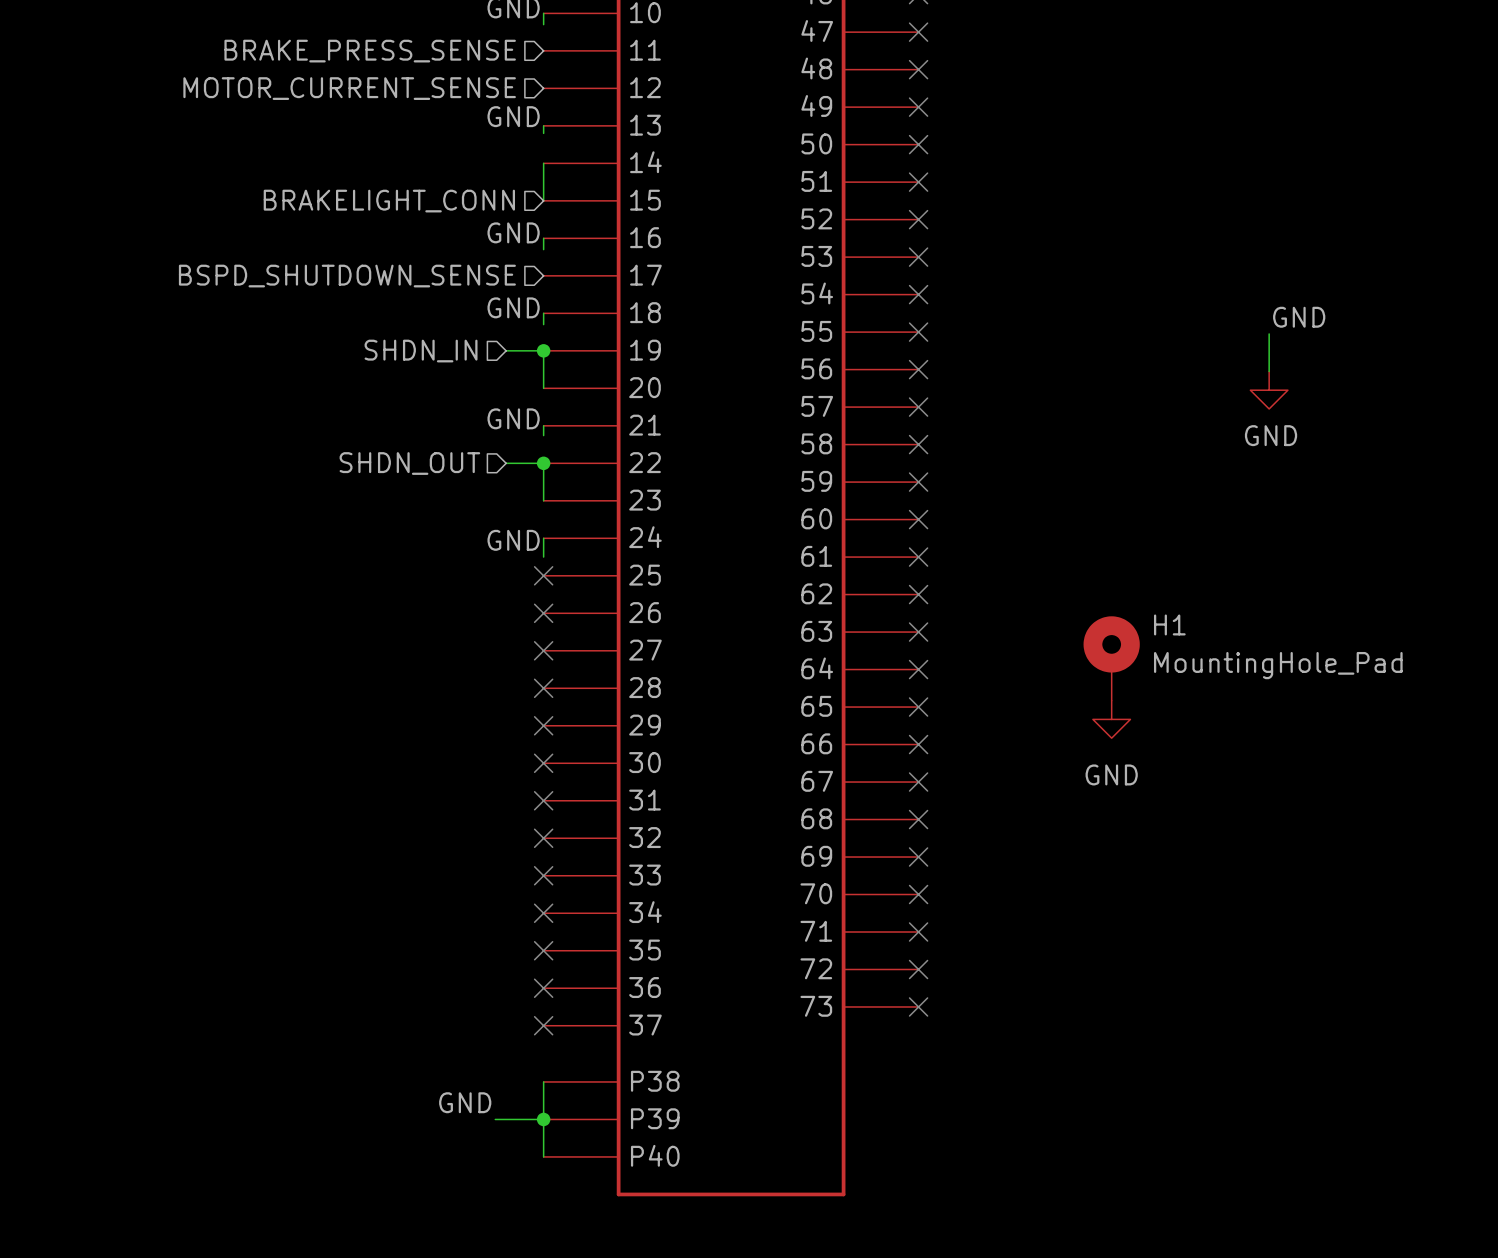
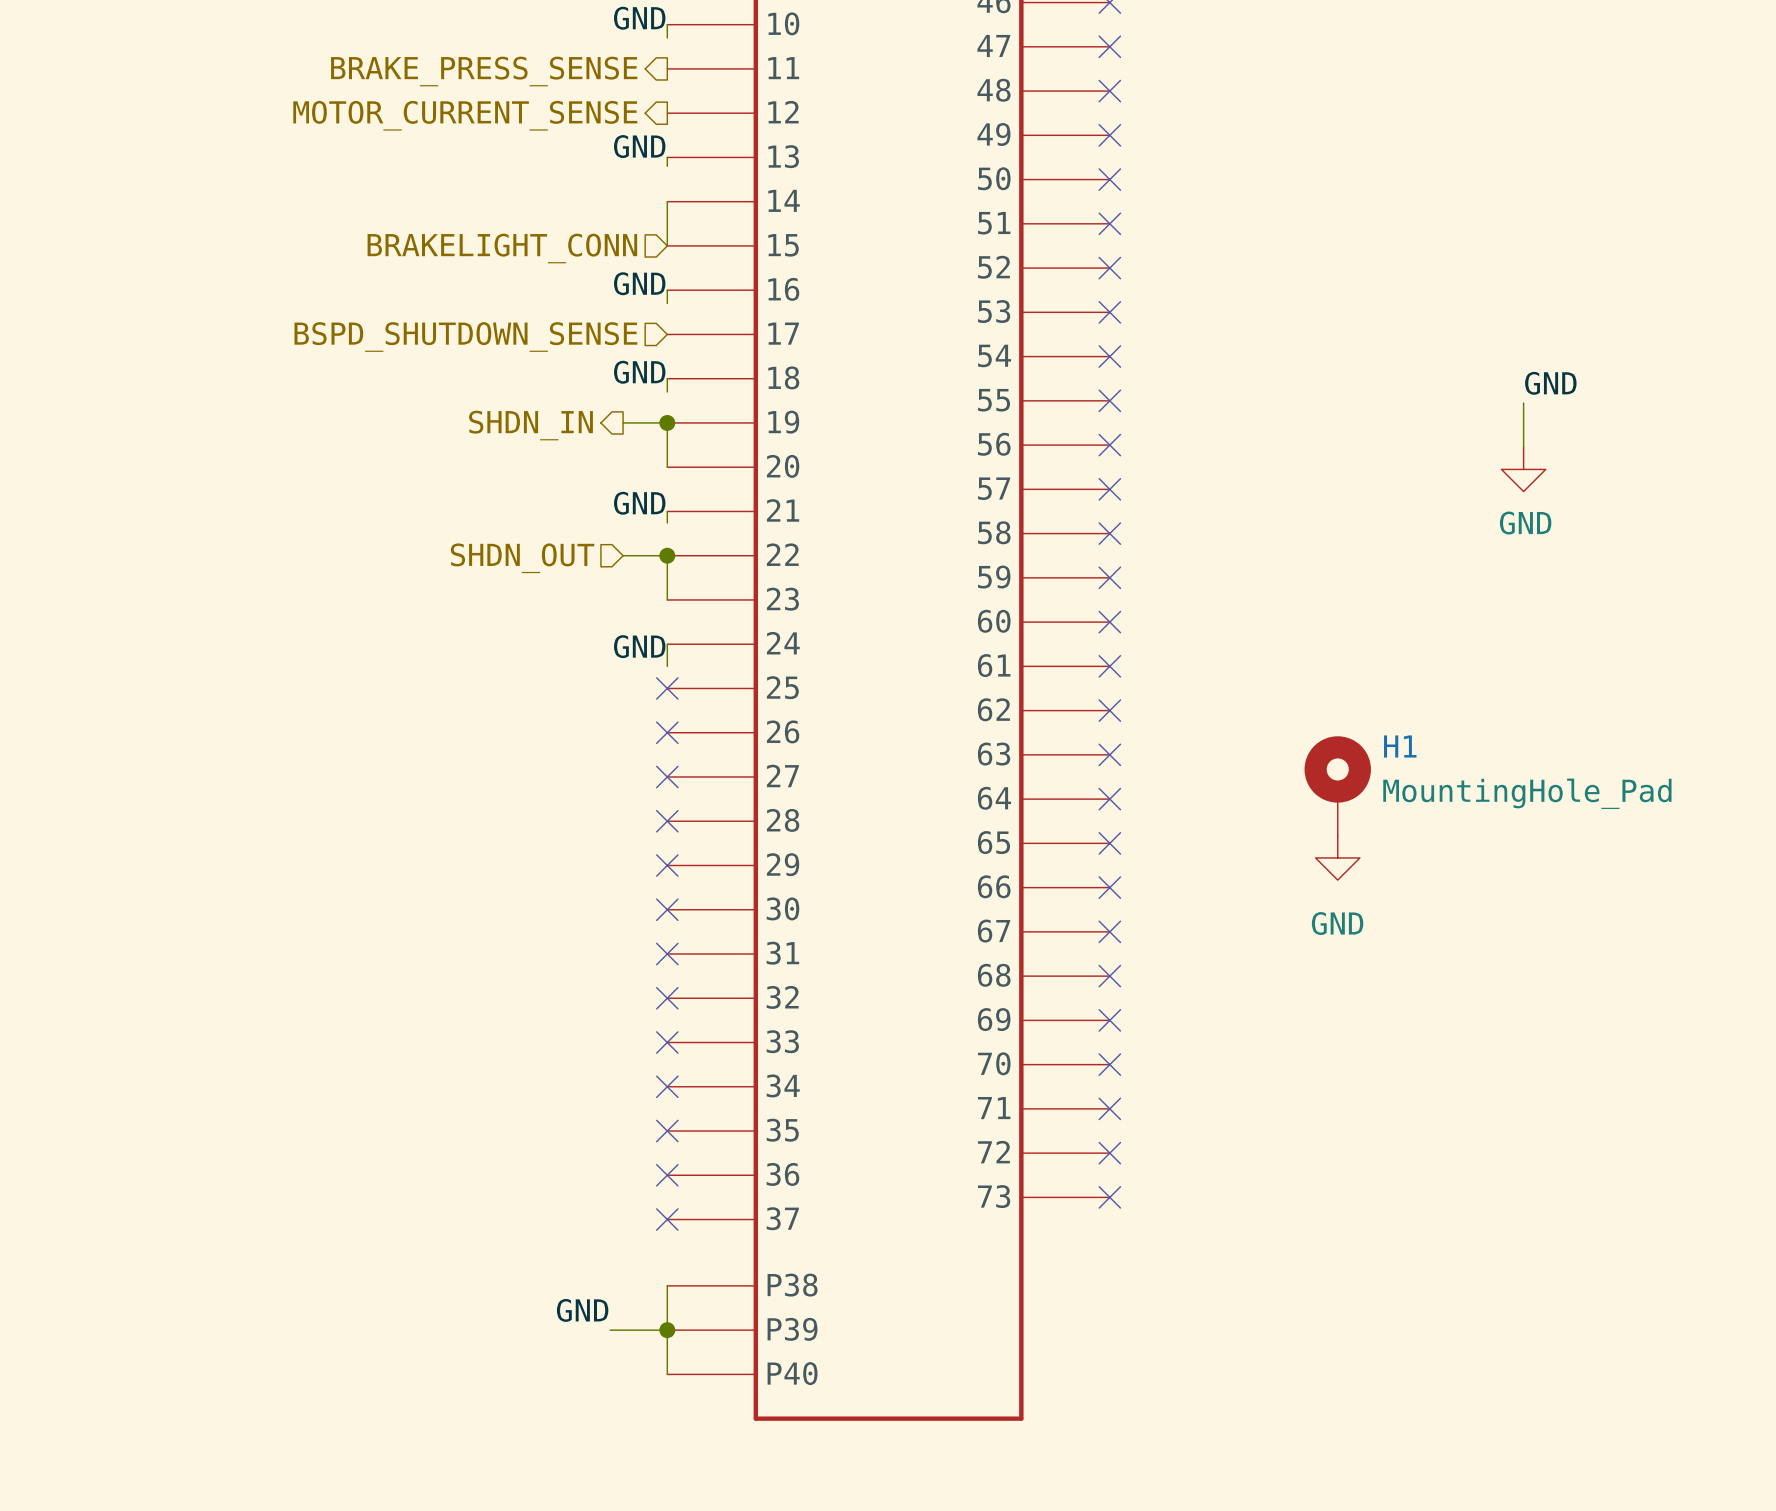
hierarchical label shape: input (370, 51) -> output (484, 71)
hierarchical label shape: input (349, 88) -> output (465, 115)
hierarchical label shape: input (421, 351) -> output (531, 425)

